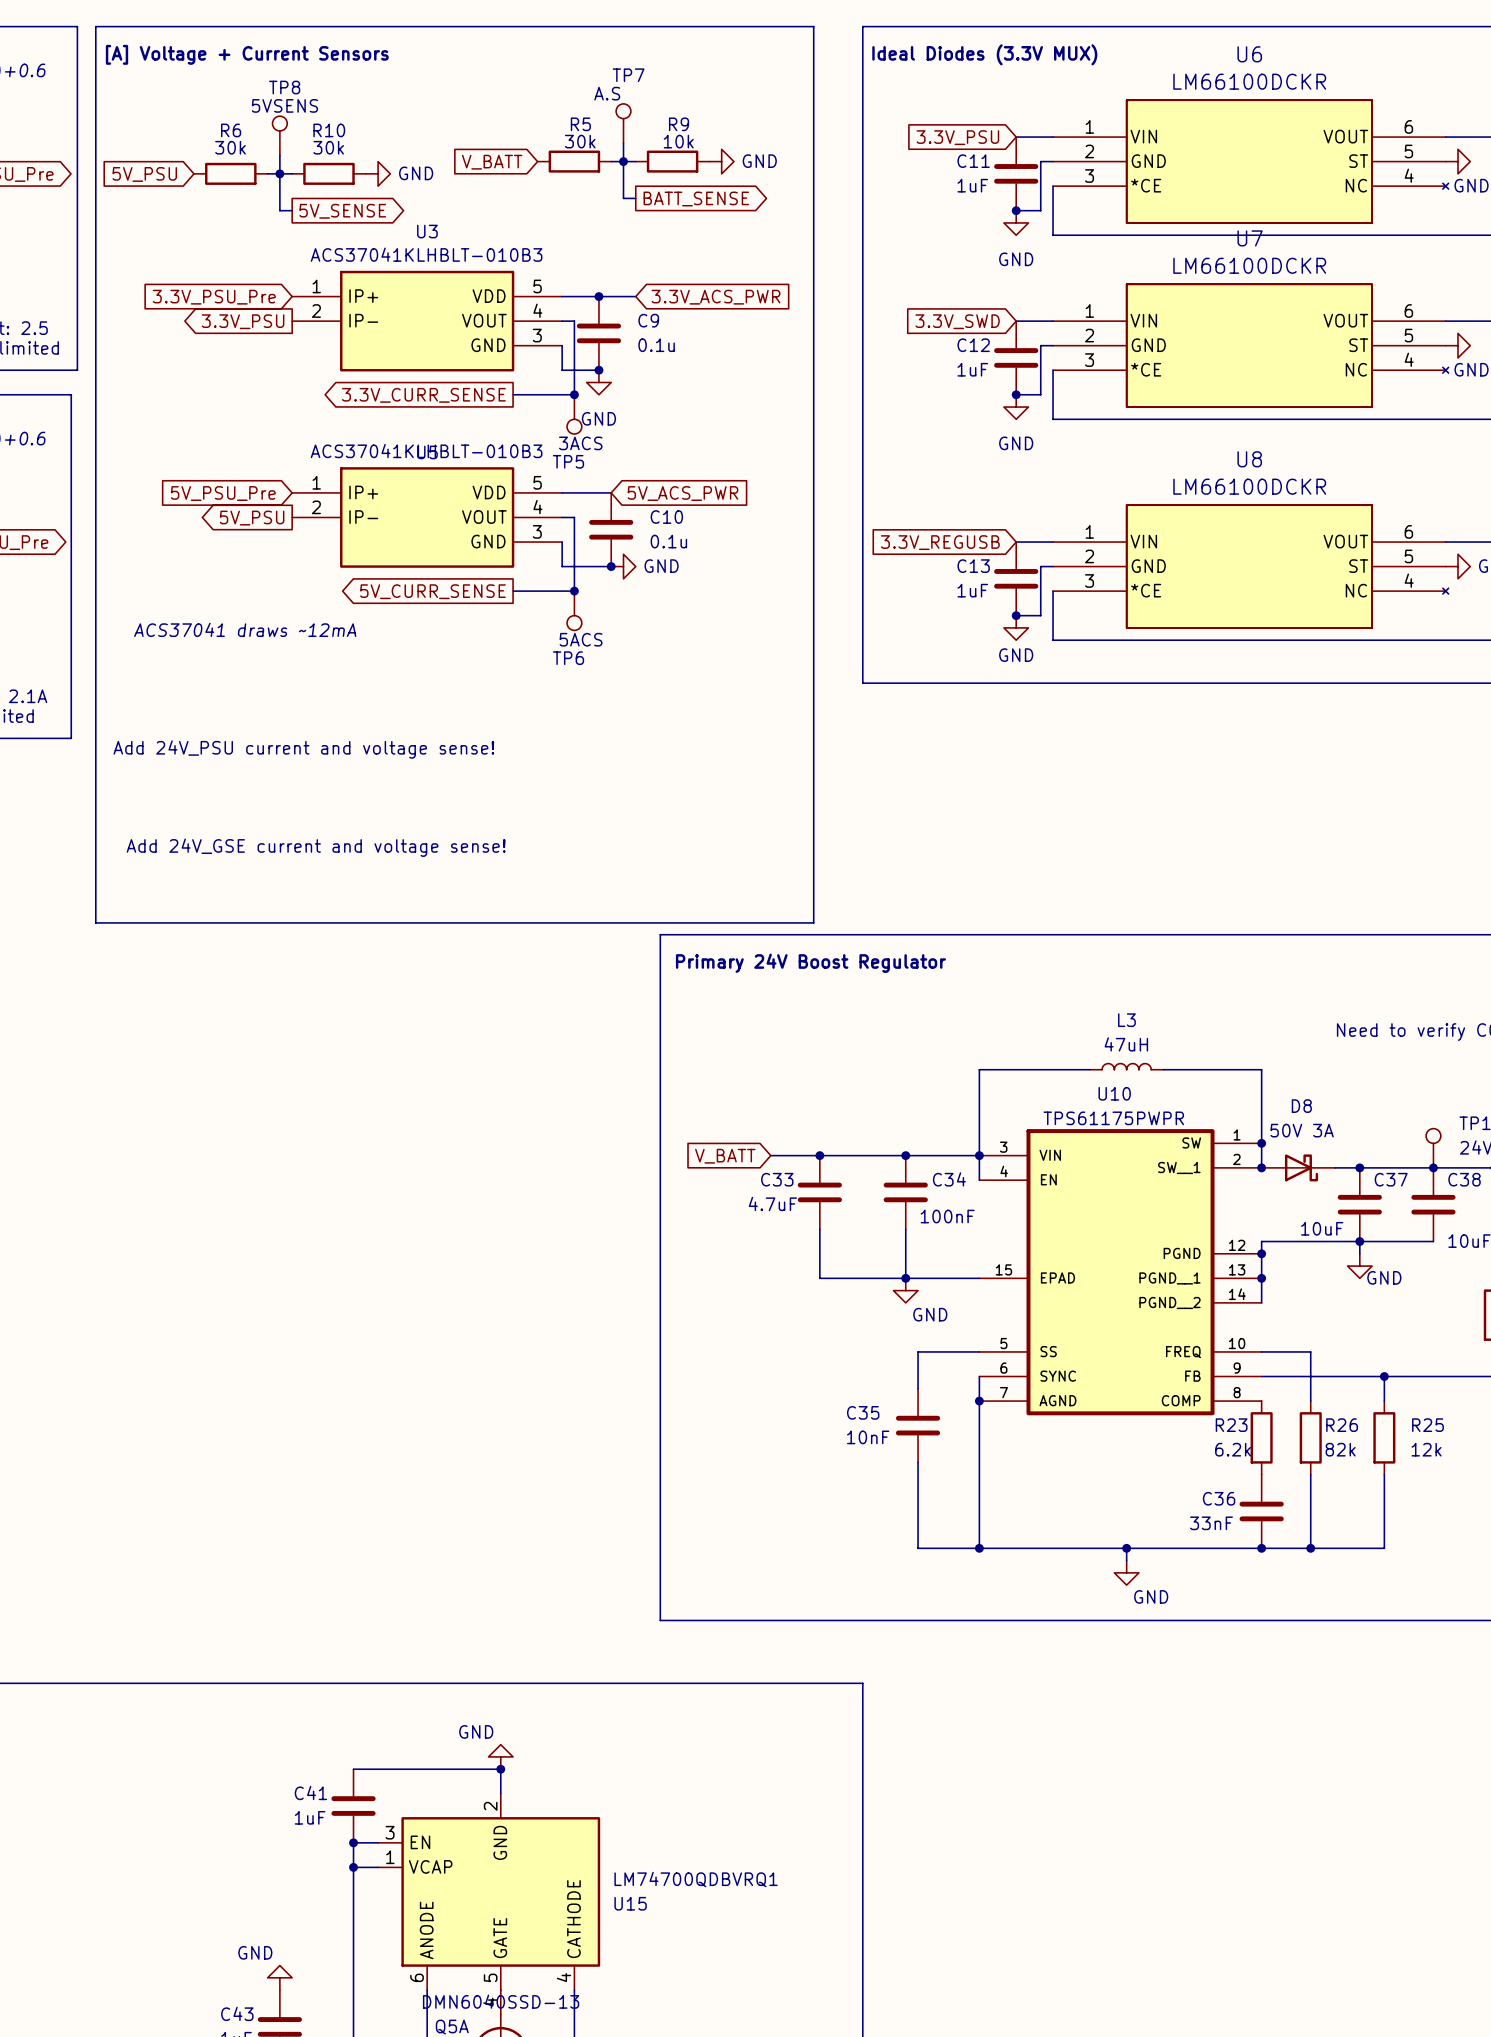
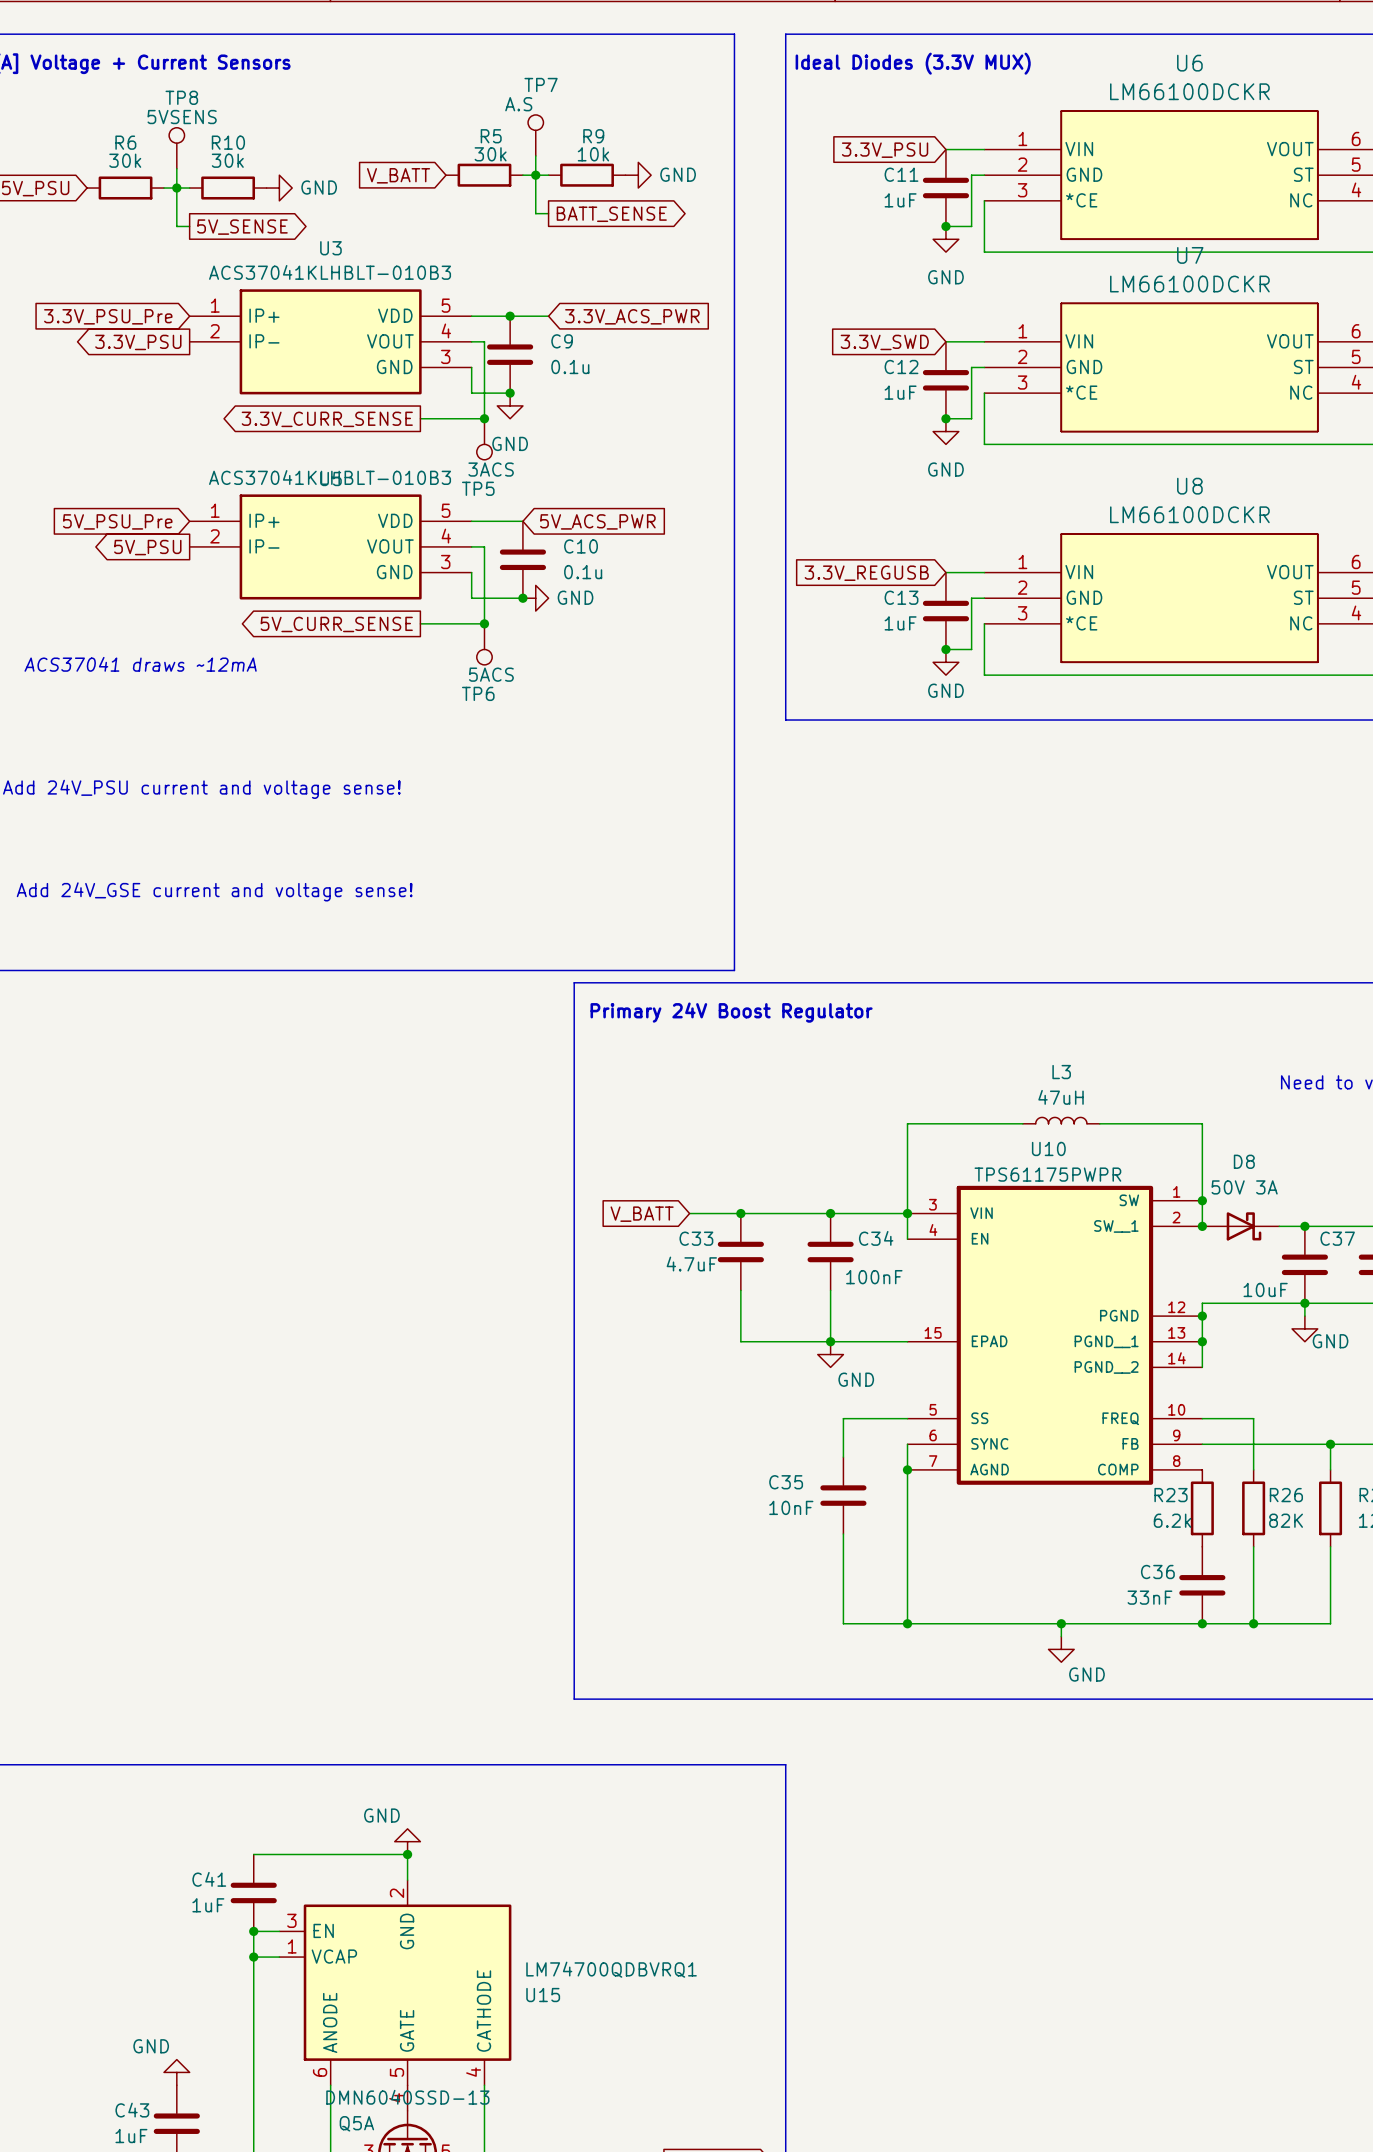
R26 value: 82k (1340, 1449) -> 82K (1286, 1520)

